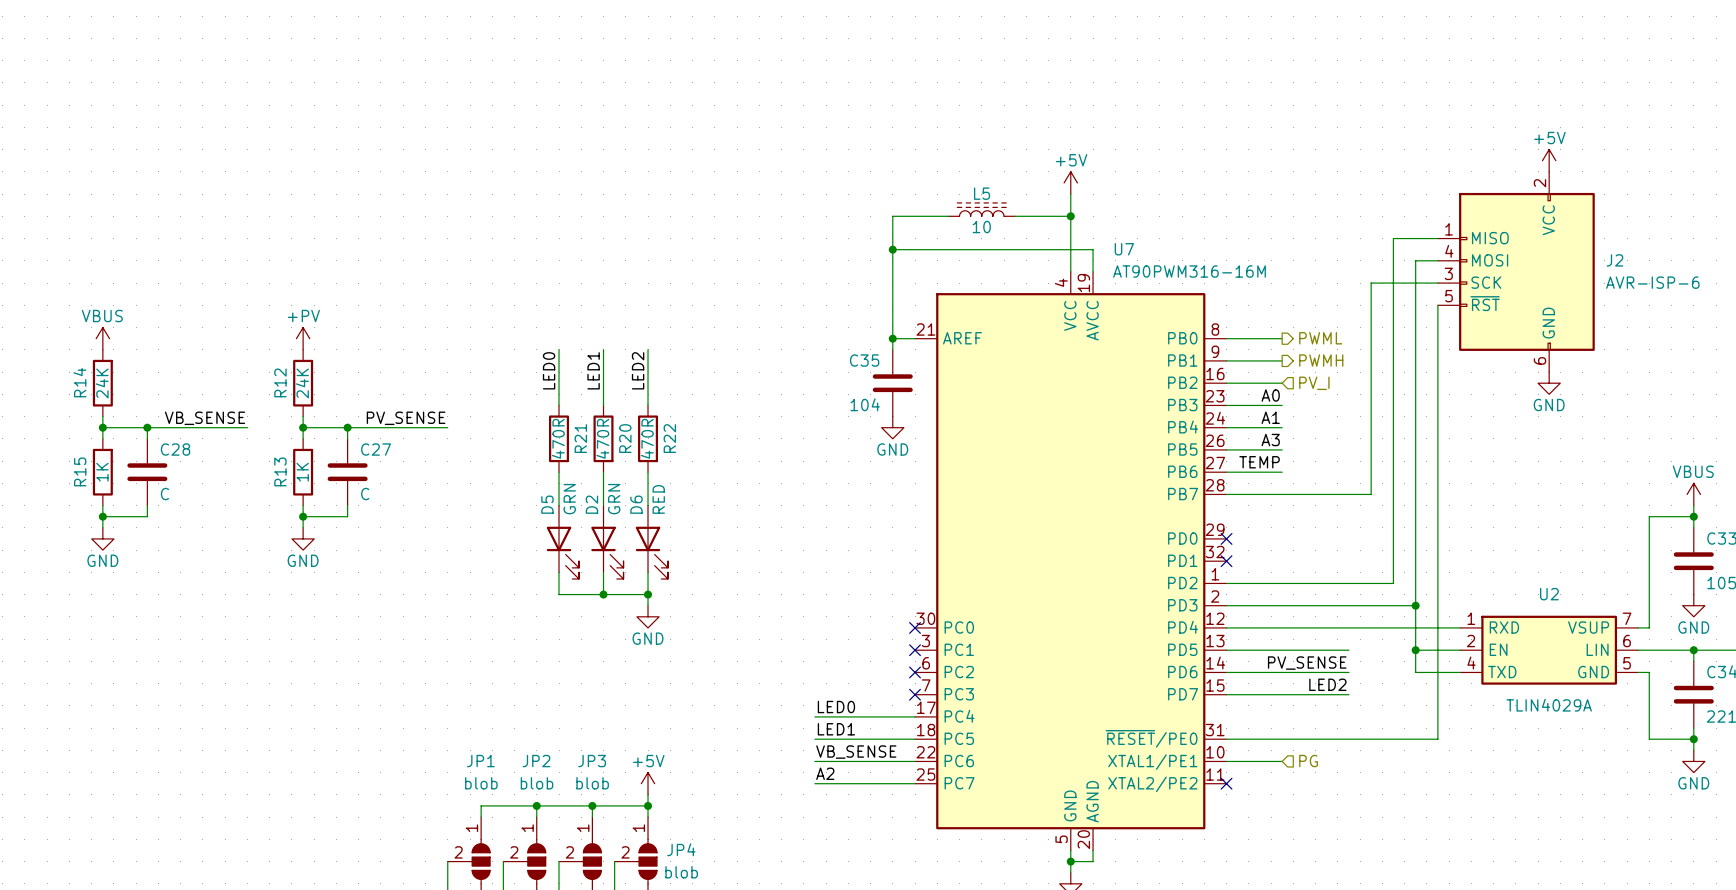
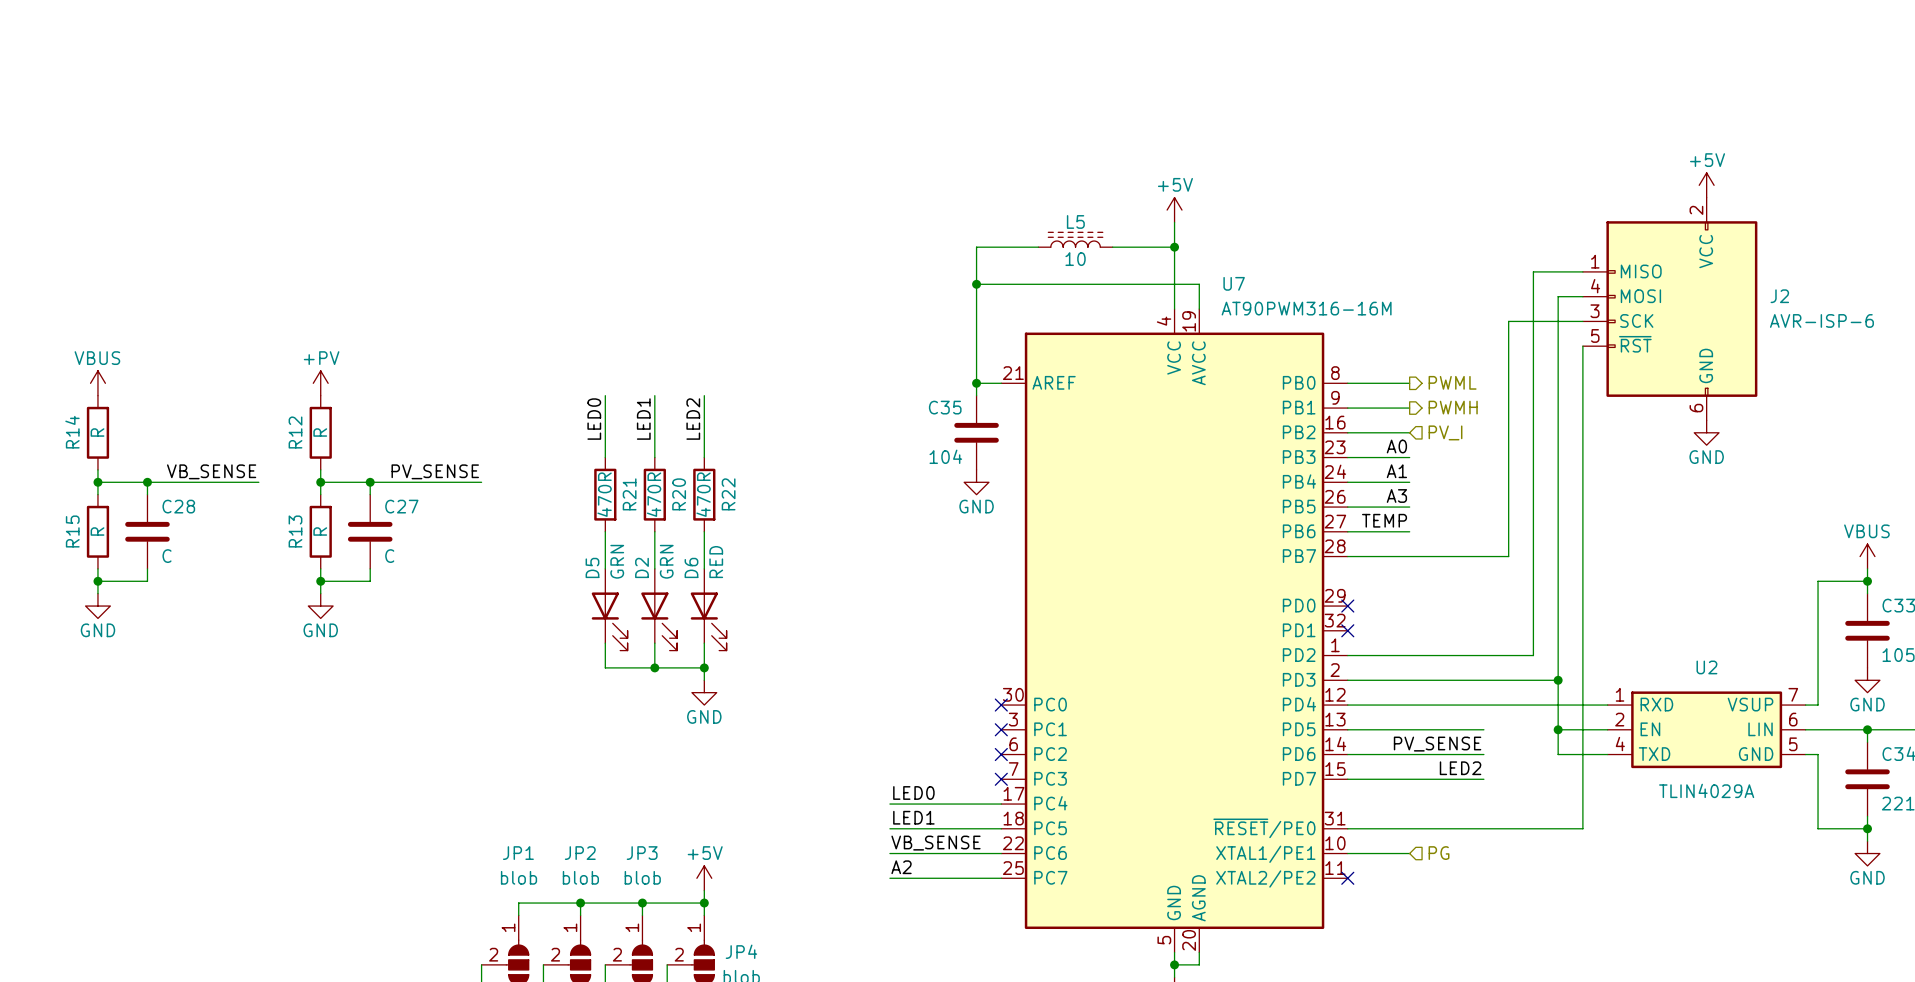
R14 value: 24K (102, 383) -> R (97, 432)
R12 value: 24K (302, 383) -> R (320, 432)
R15 value: 1K (102, 472) -> R (97, 531)
R13 value: 1K (302, 472) -> R (320, 531)

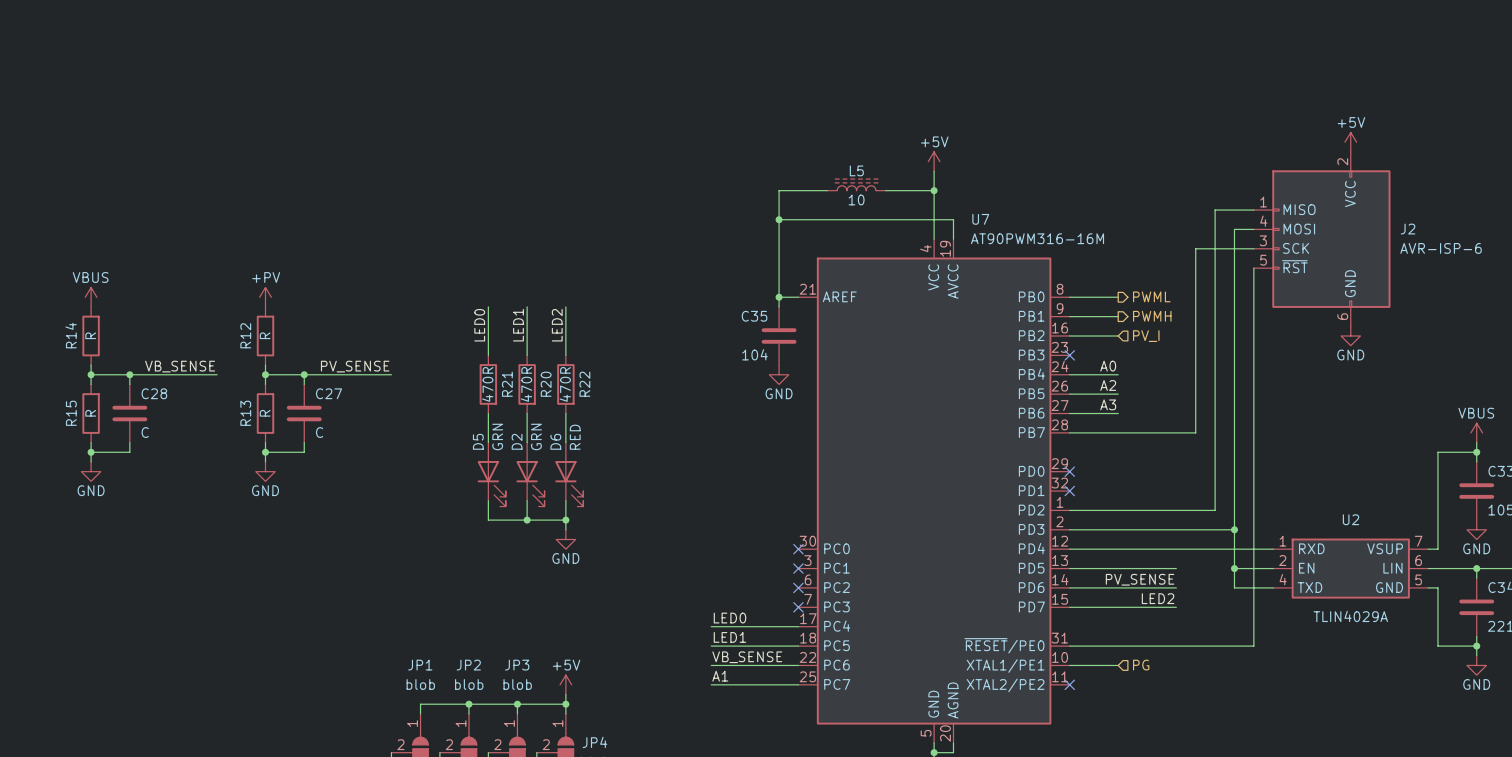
label: A0 (1396, 446) -> none
wire: (1347, 457) (1409, 457) -> none
no-connect mark: none -> (1069, 355)
label: A1 (1396, 471) -> A0 (1108, 366)
label: A3 (1396, 496) -> A2 (1108, 385)
label: TEMP (1384, 520) -> A3 (1108, 404)
label: A2 (901, 867) -> A1 (720, 676)

